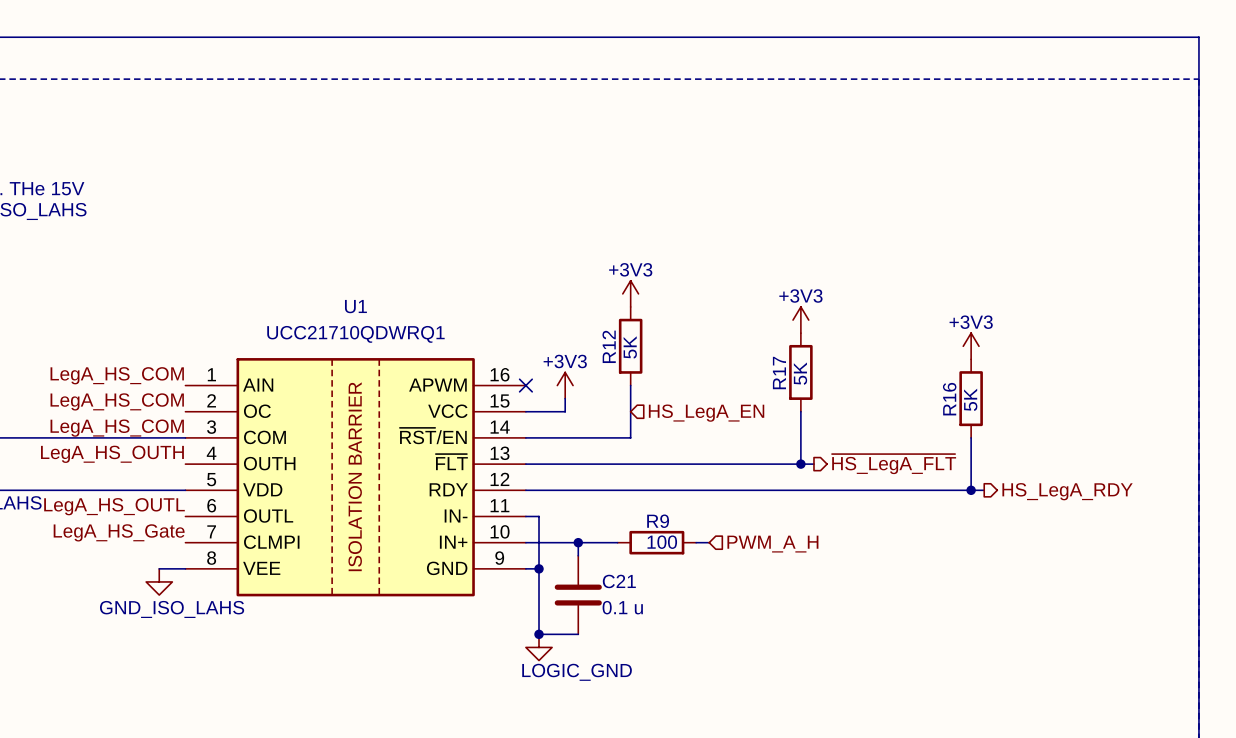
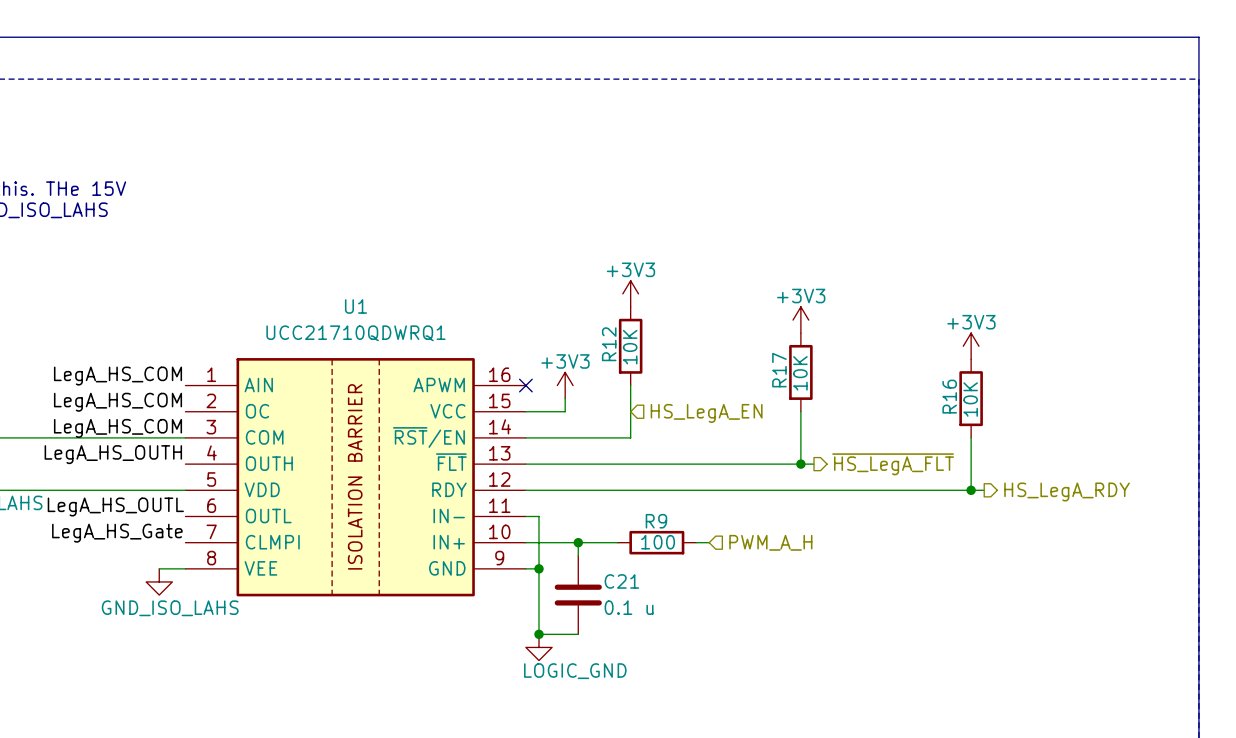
R12 value: 5K (630, 347) -> 10K (630, 347)
R17 value: 5K (800, 373) -> 10K (800, 373)
R16 value: 5K (970, 399) -> 10K (970, 399)

